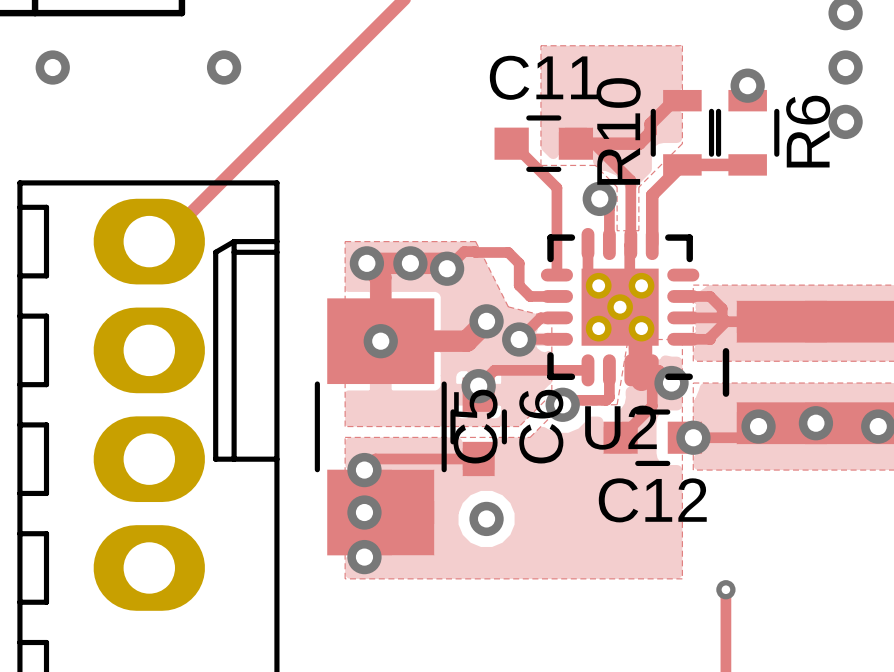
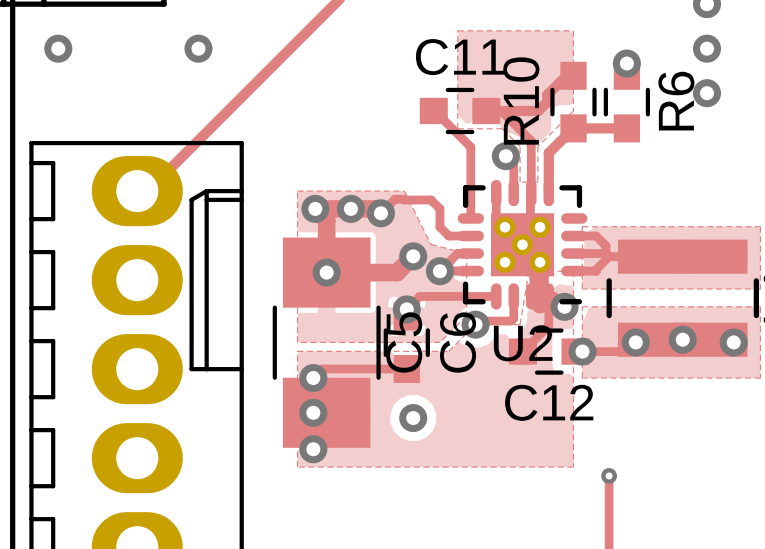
R10 footprint: [650, 89, 715, 176] -> [550, 61, 597, 143]
R6 footprint: [715, 89, 780, 176] -> [603, 61, 651, 143]

